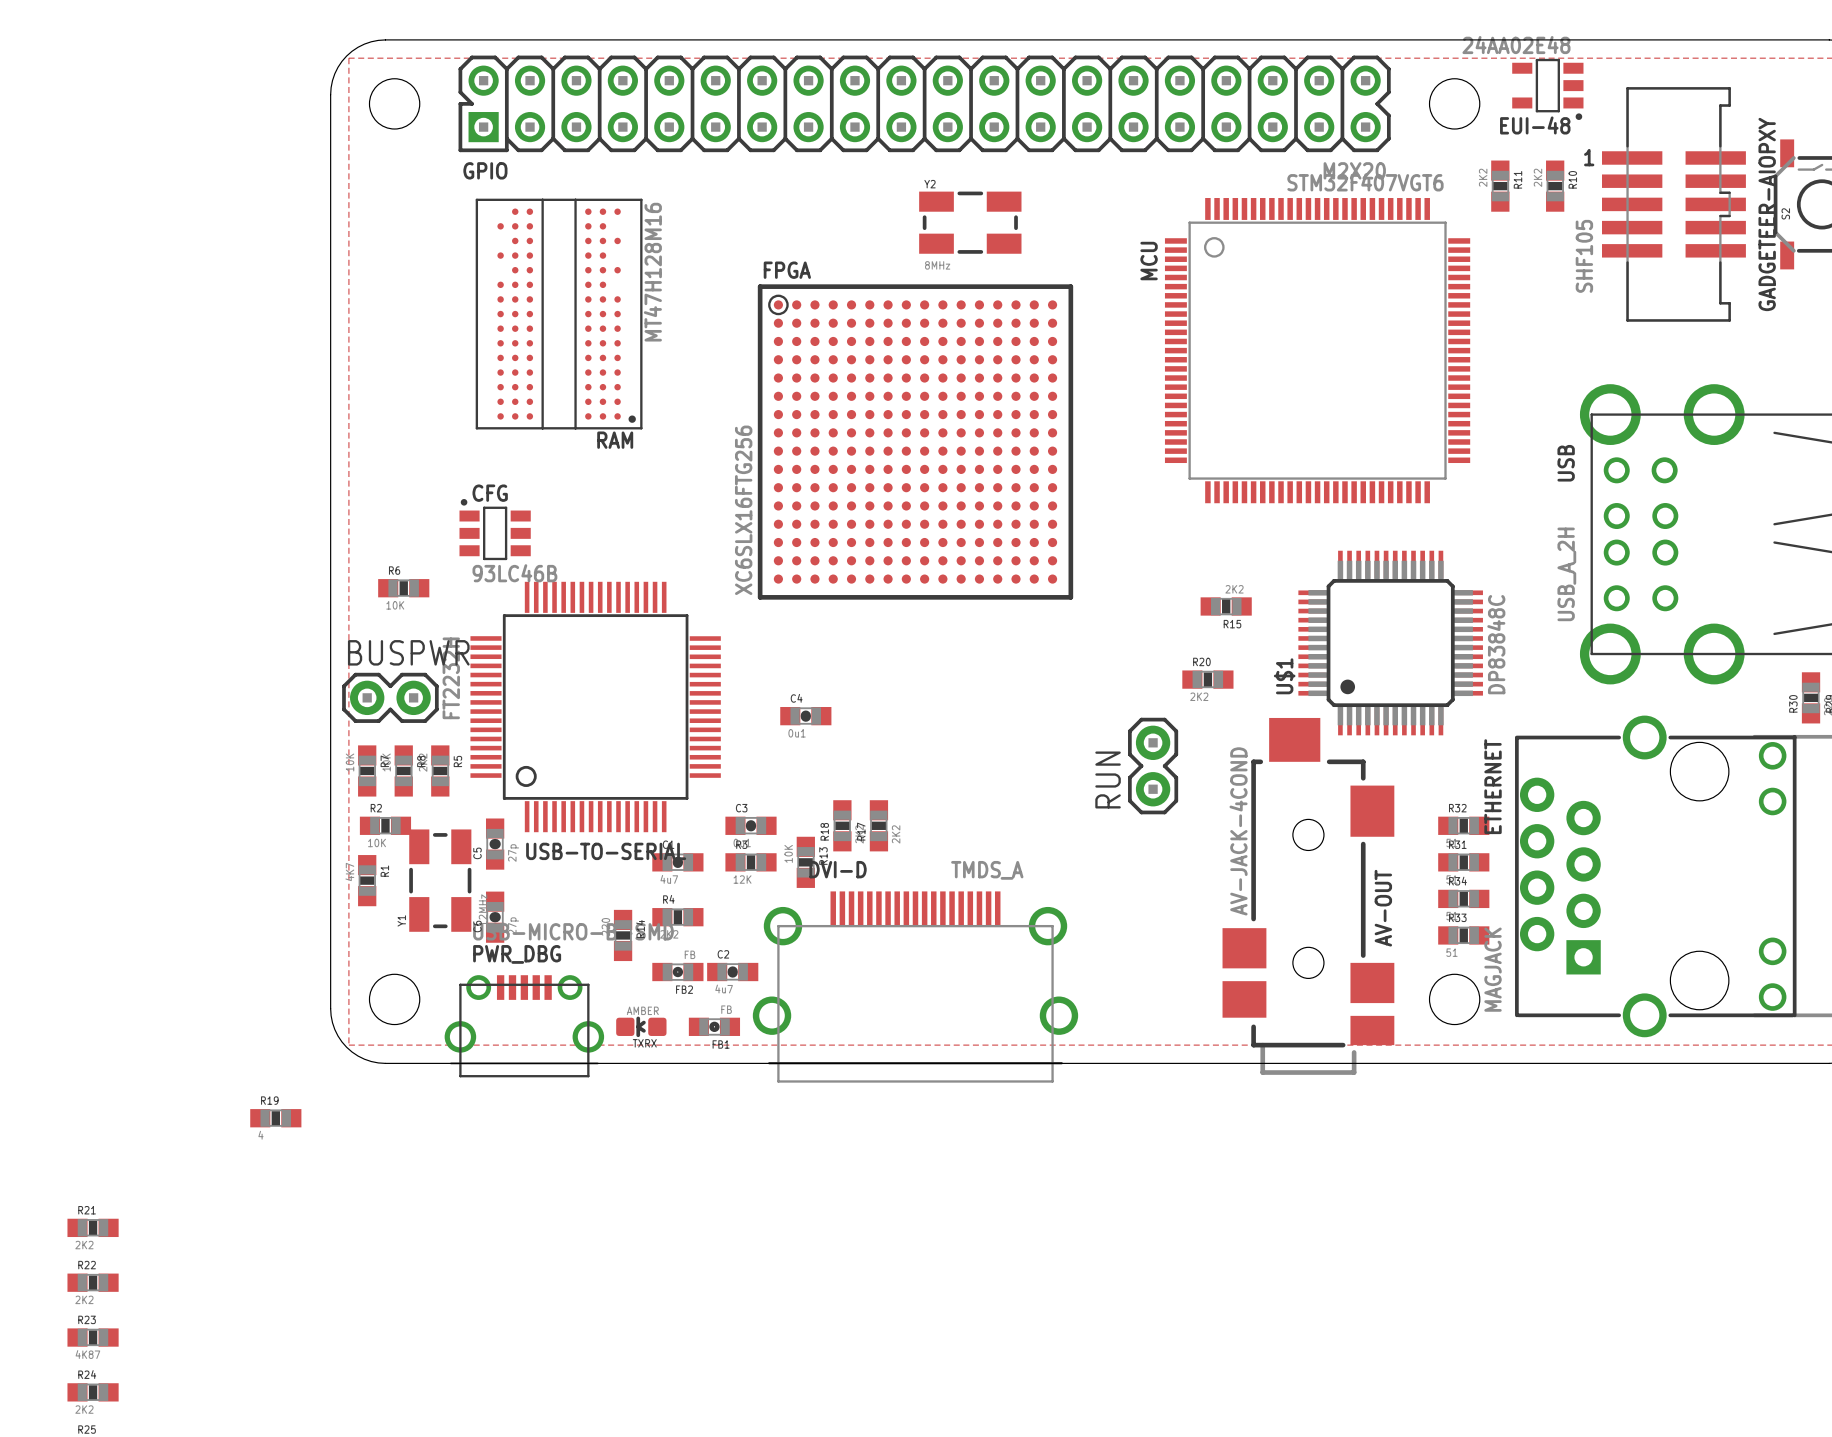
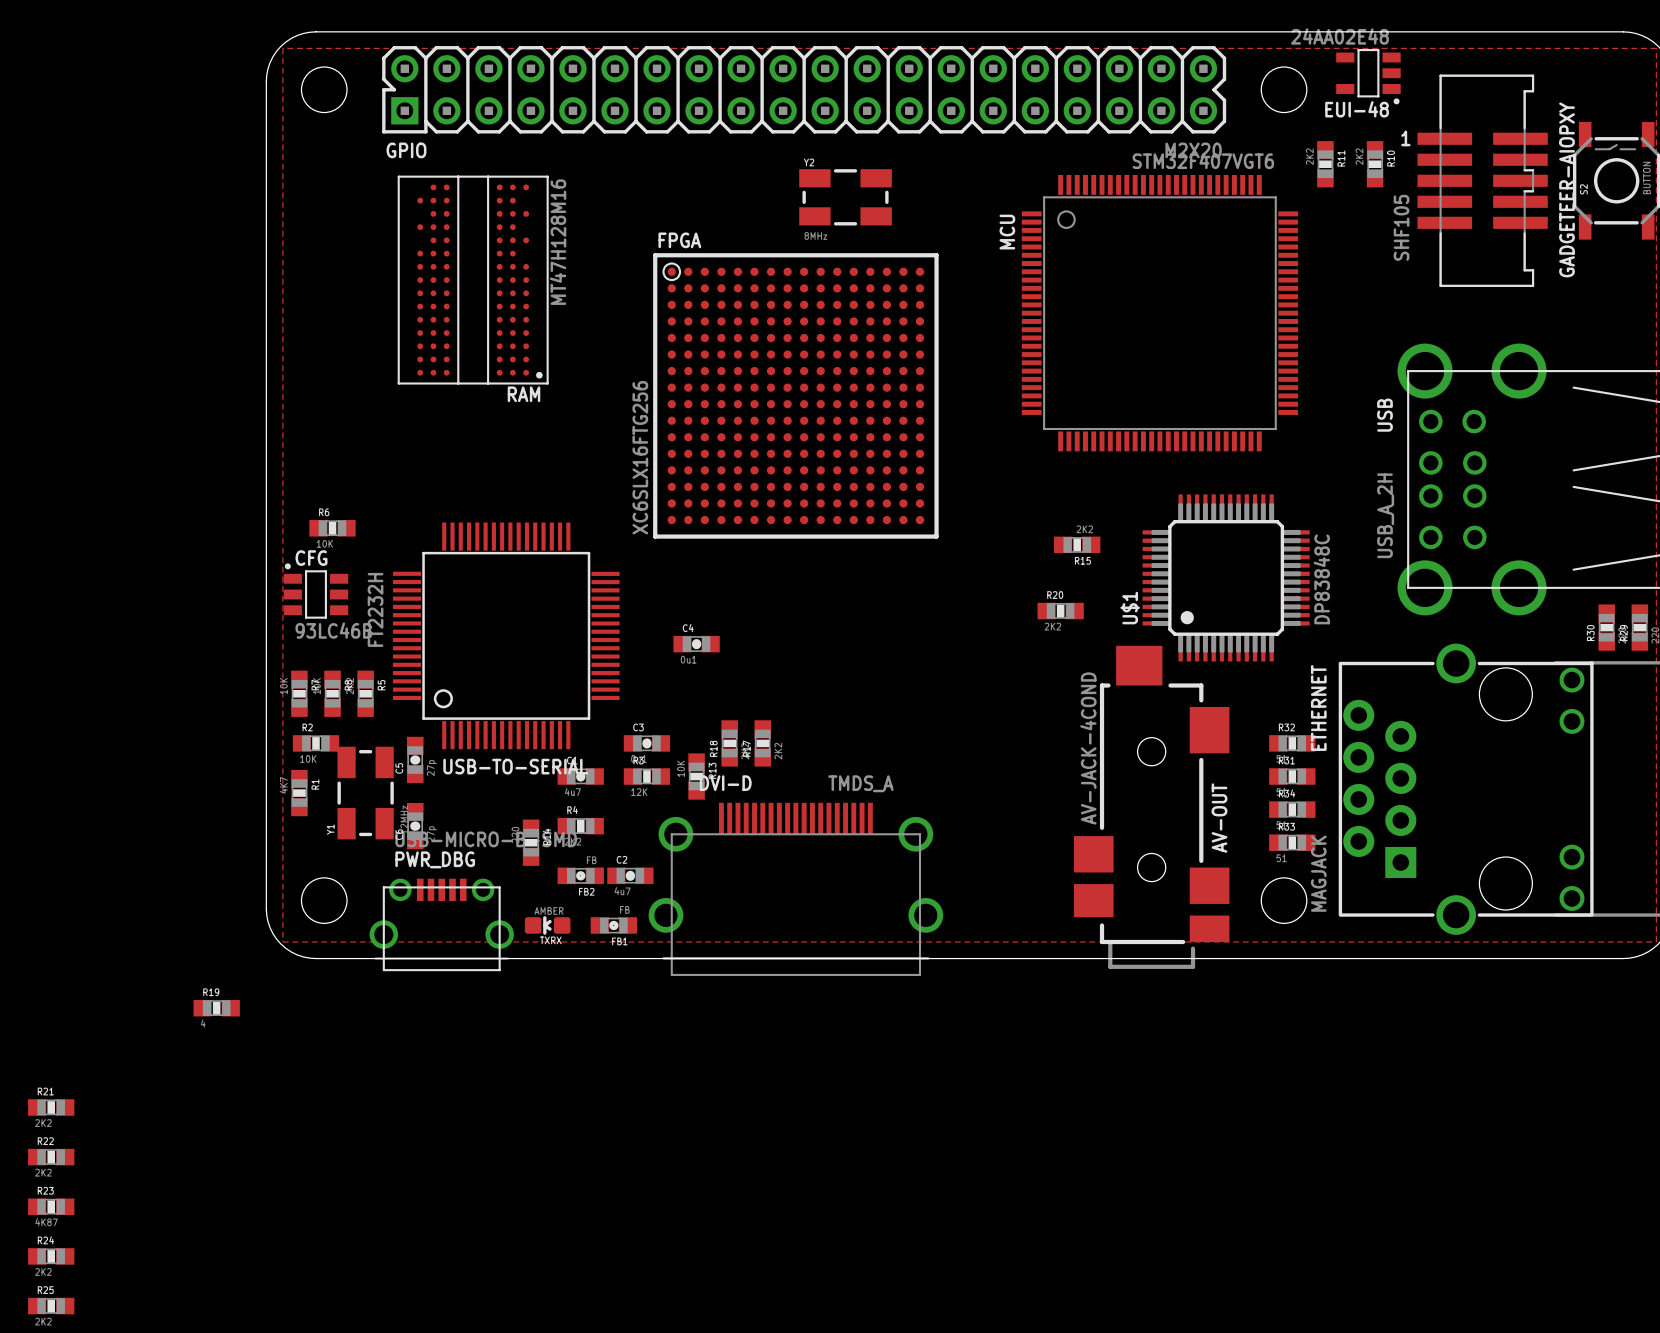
CFG position: (495, 529) -> (315, 591)
BUSPWR: (390, 697) -> none
RUN: (1153, 766) -> none

